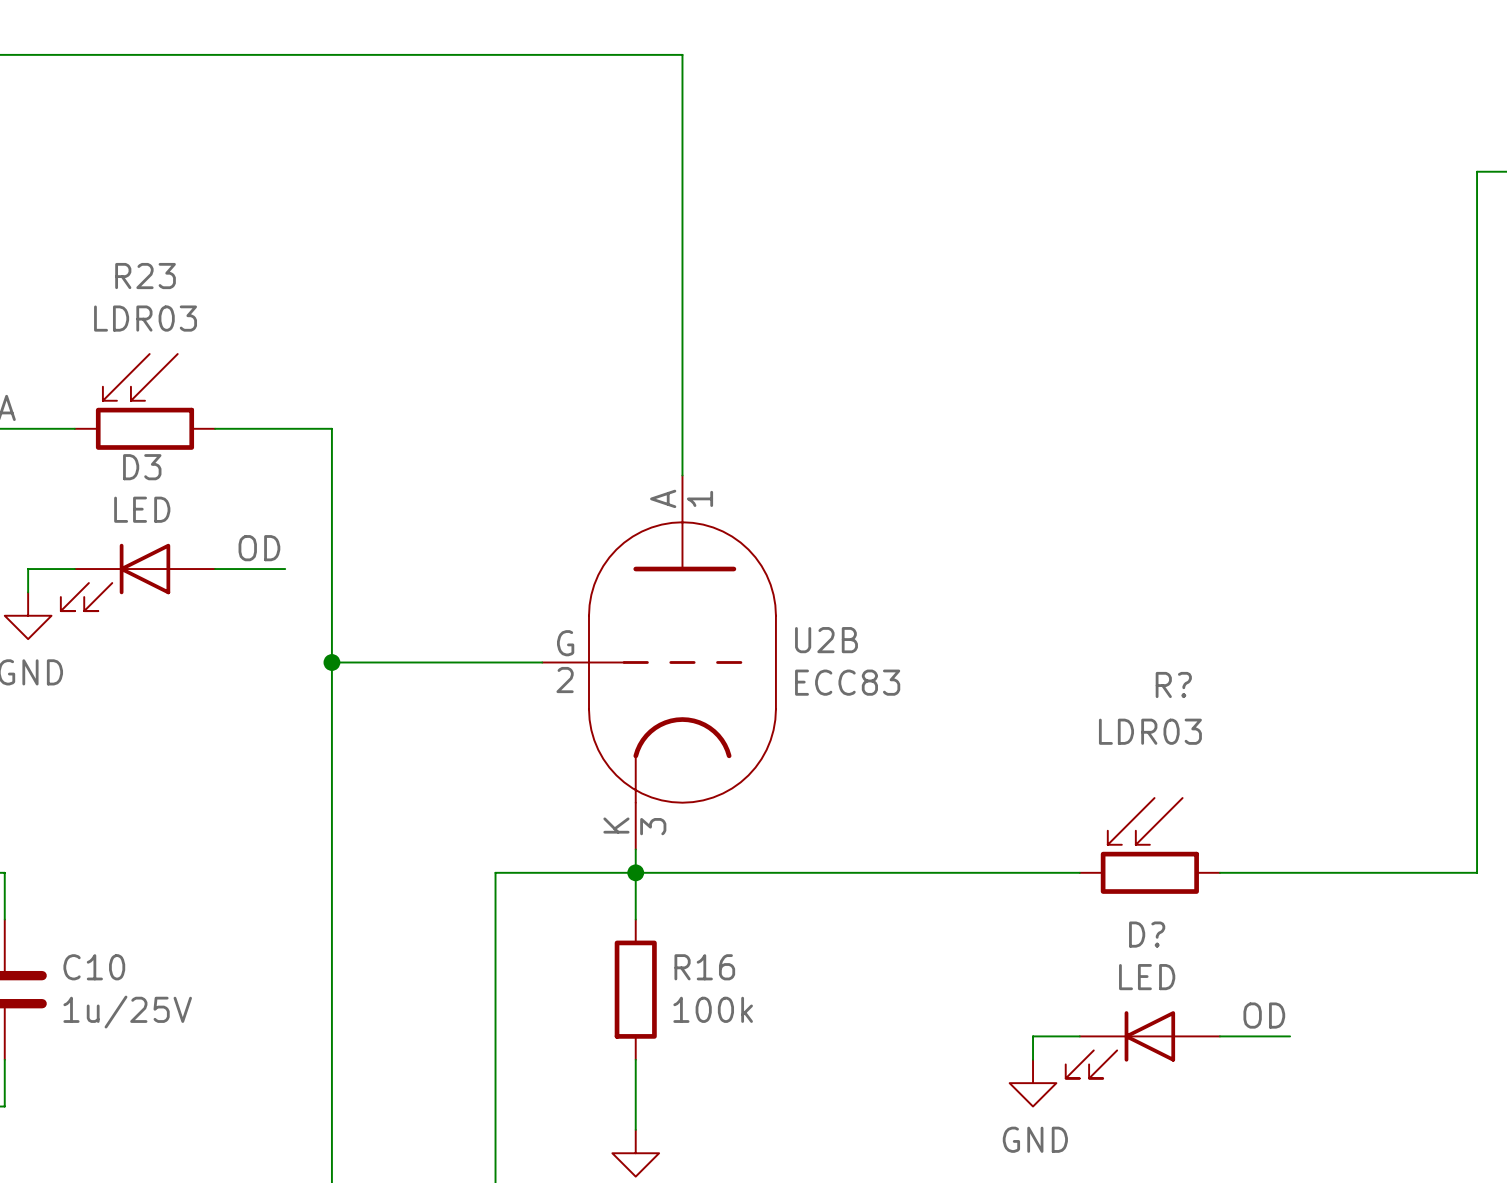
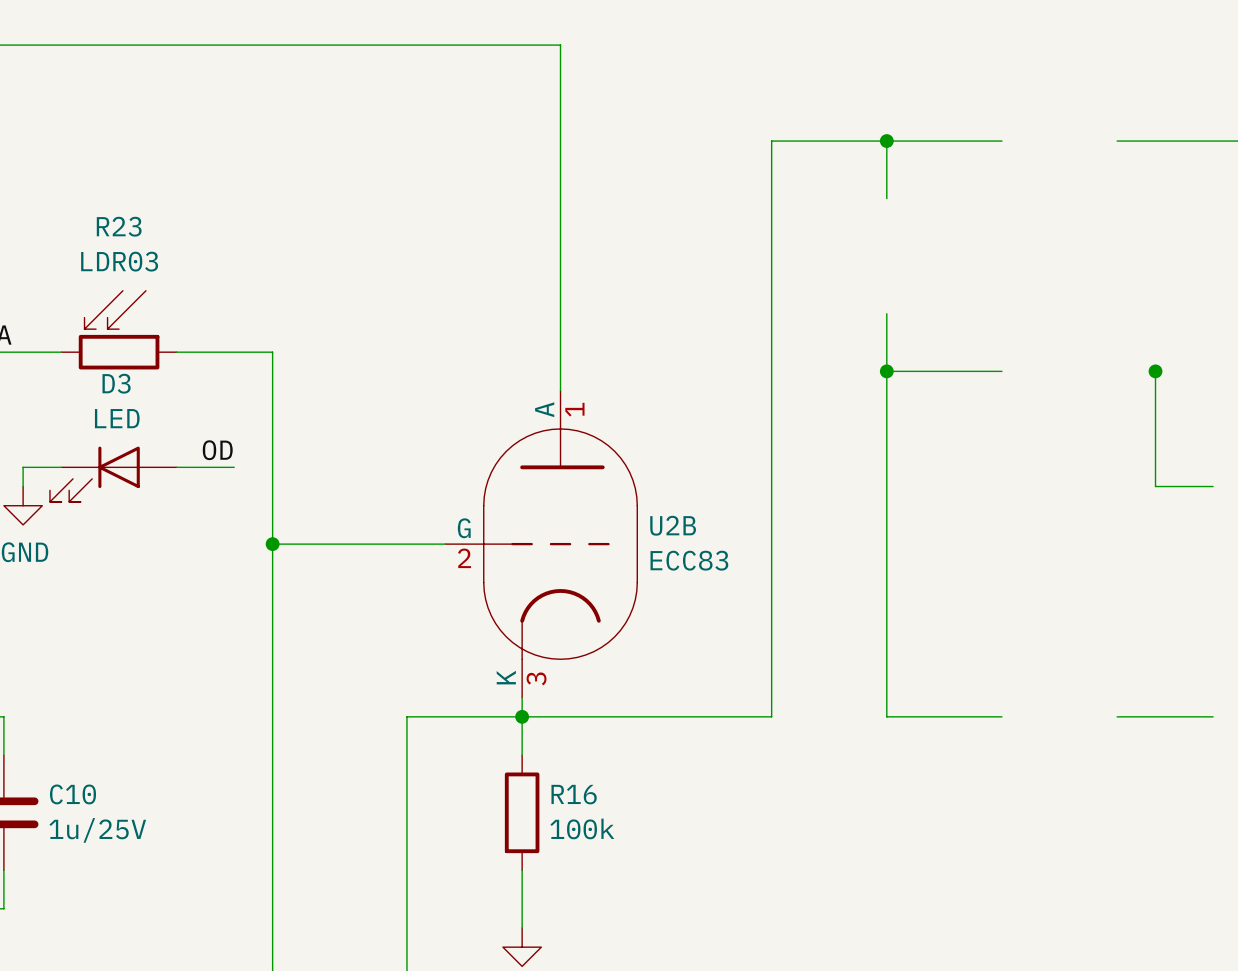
wire: none -> (886, 141) (886, 198)
junction: none -> (886, 141)
wire: (1477, 171) (1477, 872) -> (1213, 141) (1117, 141)
wire: none -> (886, 371) (1001, 371)
junction: none -> (886, 371)
wire: none -> (1155, 371) (1155, 486) (1213, 486)
junction: none -> (1155, 371)
R?: LDR03 (1149, 845) -> none
wire: (939, 872) (1079, 872) -> (771, 716) (771, 141) (1001, 141)
wire: (1219, 872) (1360, 872) -> (1001, 716) (886, 716) (886, 313)
label: OD (1264, 1015) -> none
wire: (1079, 1036) (1033, 1036) (1033, 1059) -> none
wire: (1219, 1036) (1290, 1036) -> none
D?: LED (1142, 1044) -> none
power symbol: GND (1033, 1083) -> none

